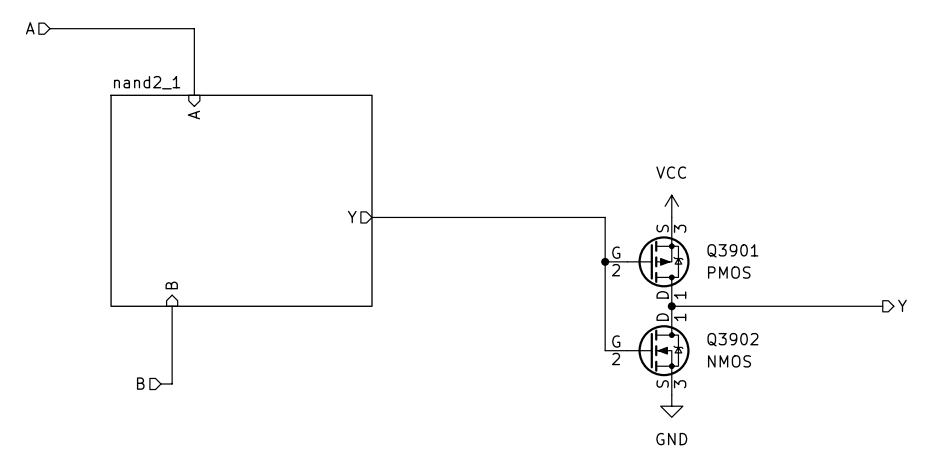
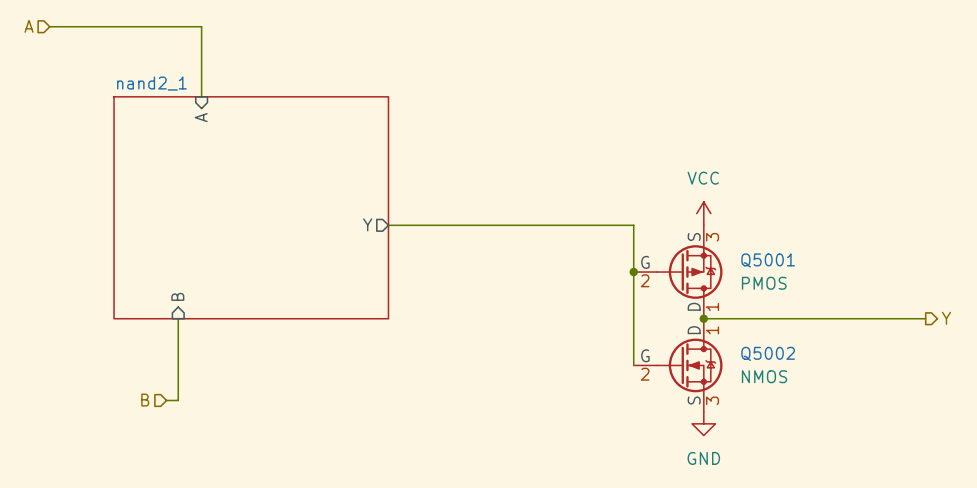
Q3901 name: Q3901 (732, 250) -> Q5001 (768, 260)
Q3902 name: Q3902 (732, 339) -> Q5002 (768, 353)

